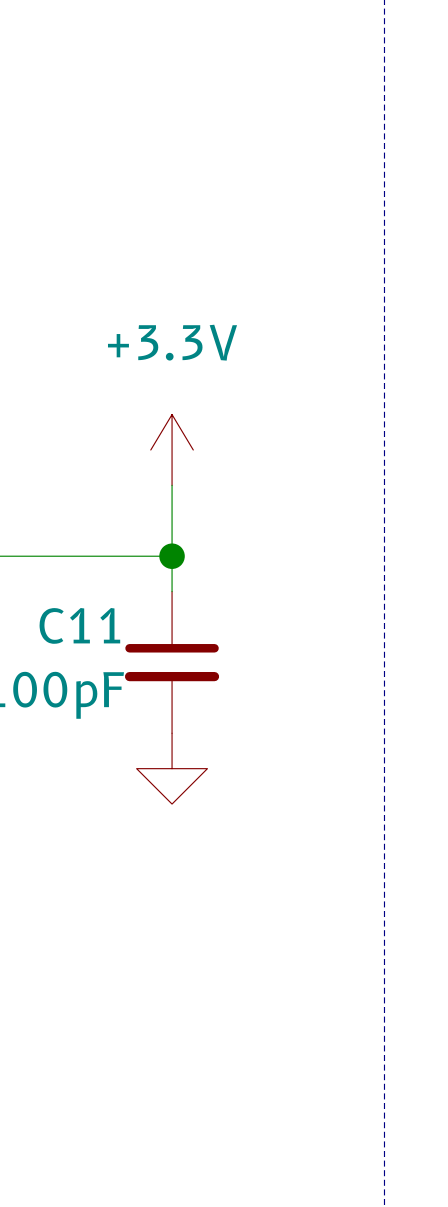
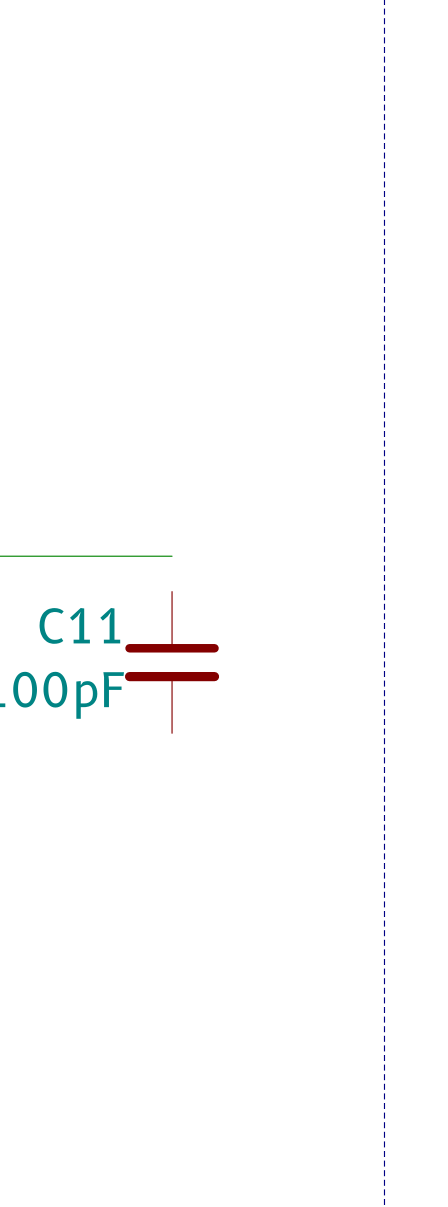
power symbol: +3.3V (172, 449) -> none
wire: (172, 485) (172, 591) -> none
junction: (172, 556) -> none
power symbol: (172, 768) -> none

